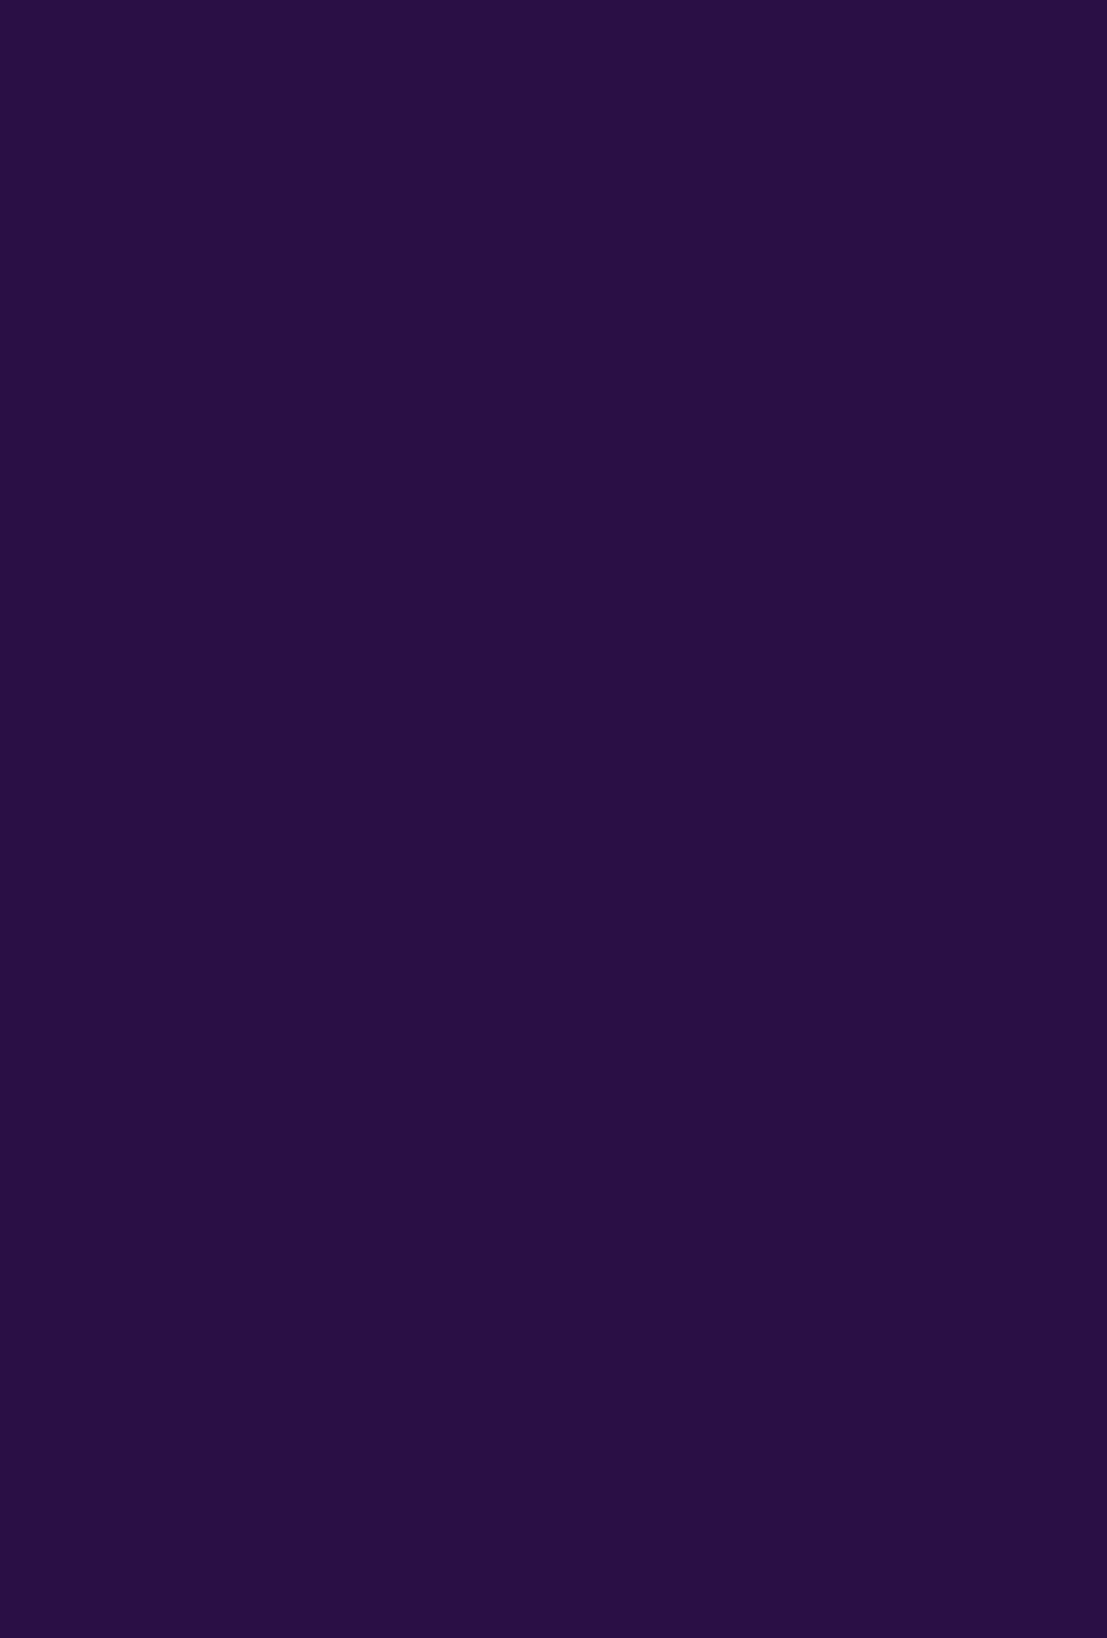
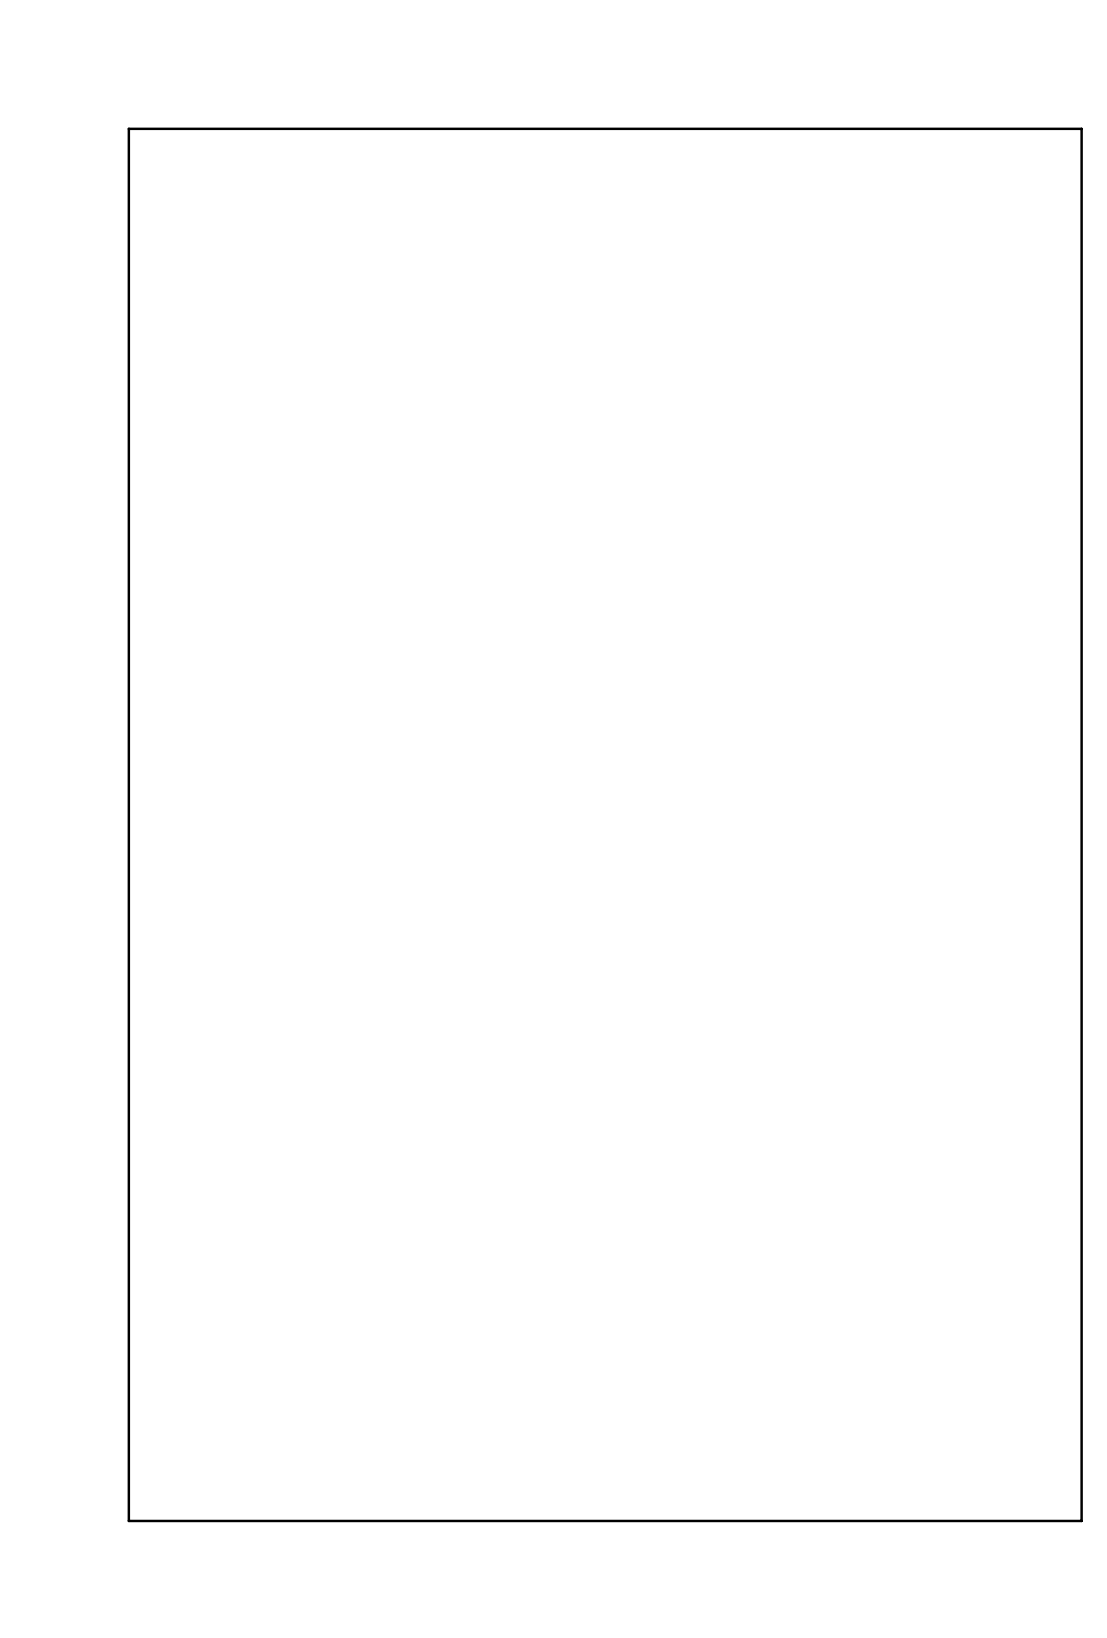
board edge: none -> (128, 128) (1081, 128) (1081, 1520) (128, 1520) (128, 128)

